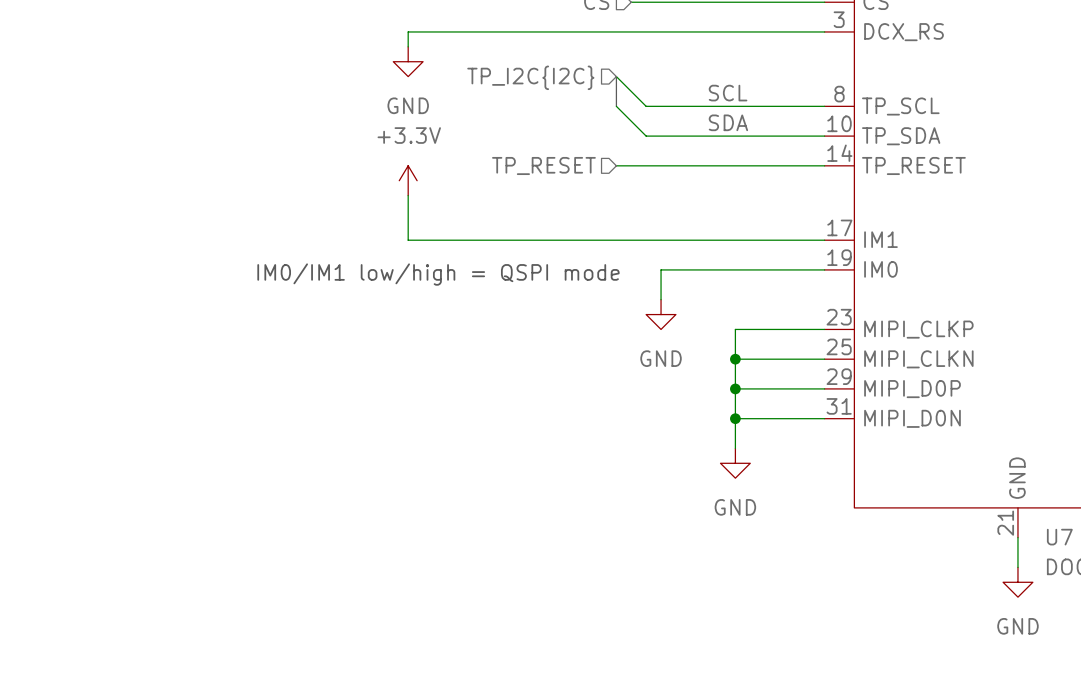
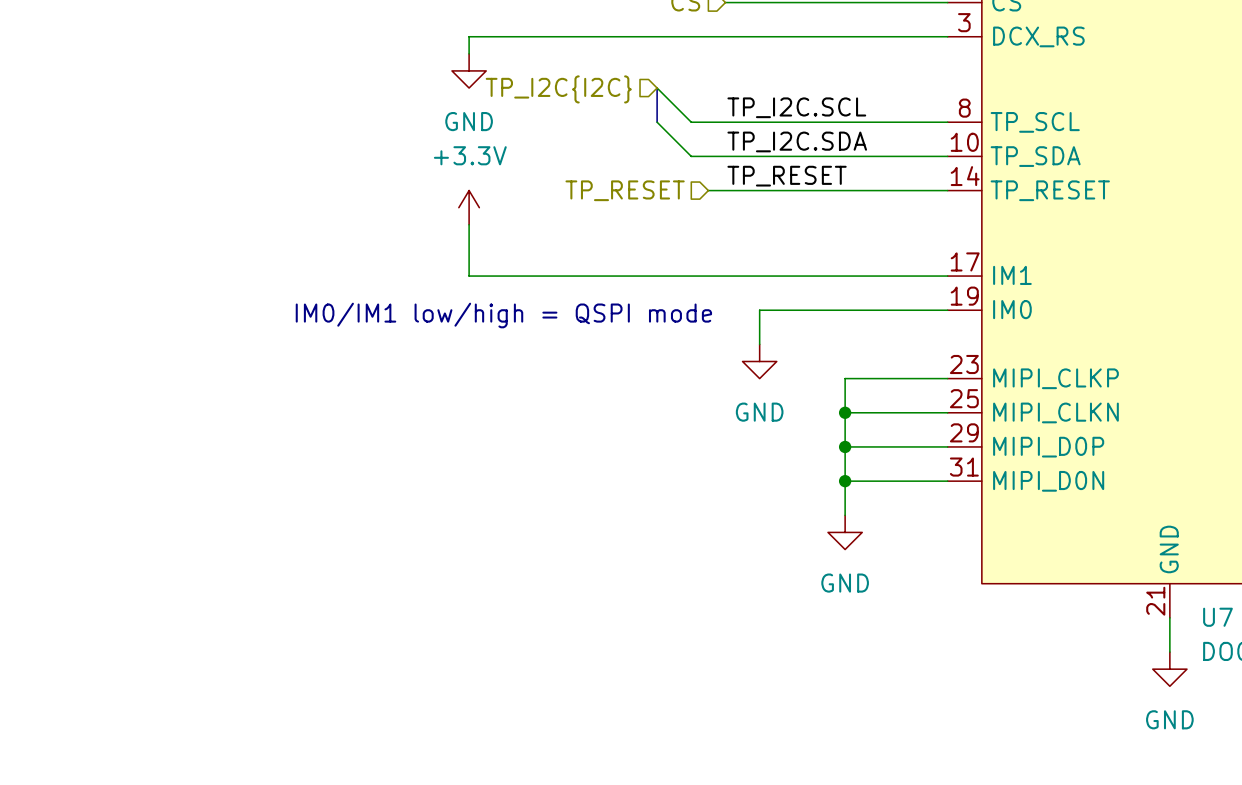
wire: (616, 76) (646, 106) -> (657, 88) (691, 122) (742, 122)
bus: (616, 76) (616, 106) -> (657, 88) (657, 122)
hierarchical label position: TP_I2C{I2C} (530, 77) -> TP_I2C{I2C} (558, 89)
label: none -> TP_I2C.SCL (796, 107)
label: SCL (728, 93) -> none
wire: (616, 106) (646, 136) -> (657, 122) (691, 156) (742, 156)
label: SDA (728, 122) -> none
label: none -> TP_I2C.SDA (797, 141)
label: none -> TP_RESET (787, 176)

